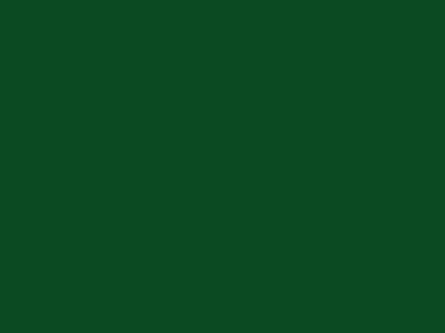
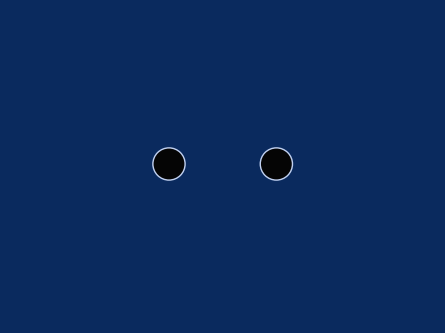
part: none -> (222, 163)

